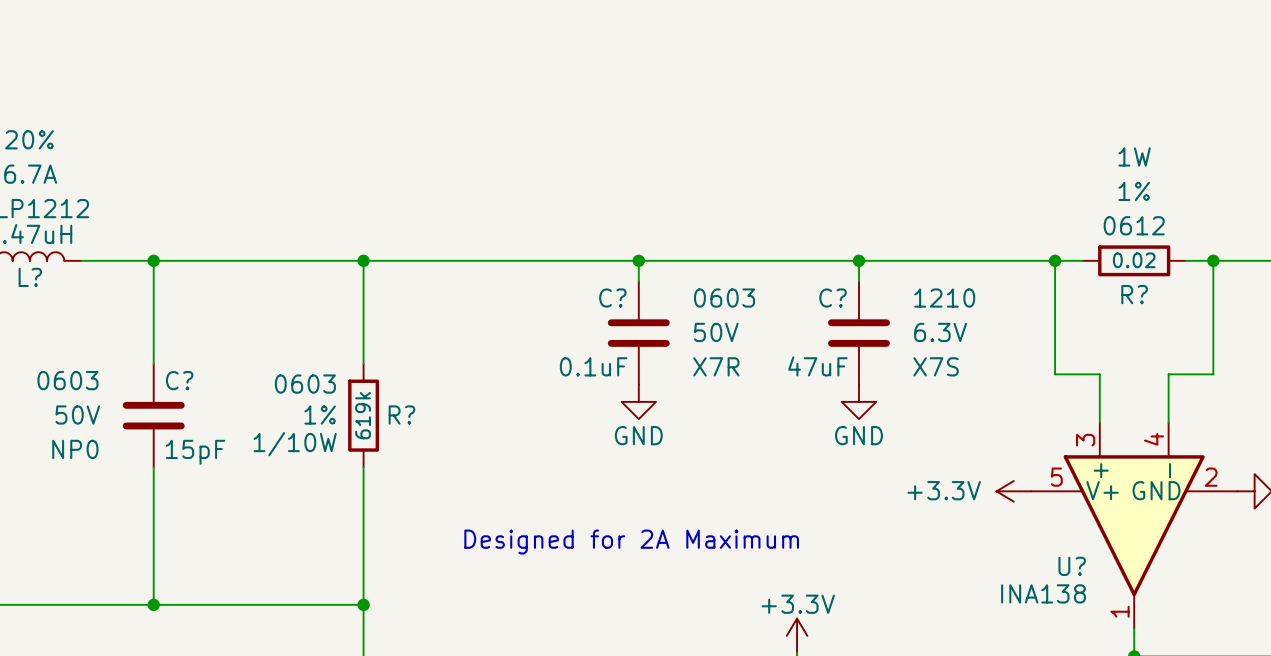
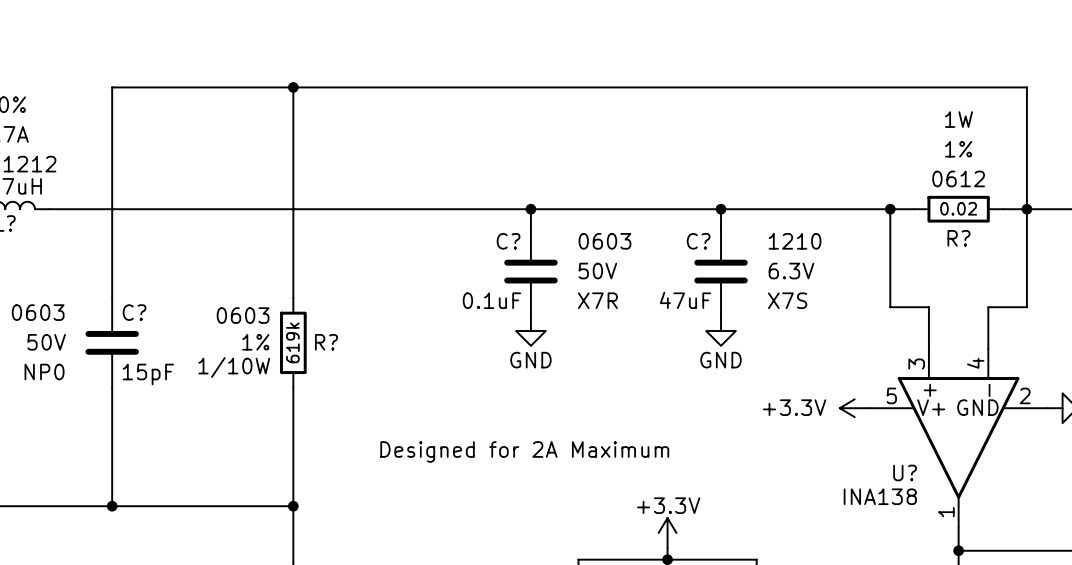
wire: none -> (293, 87) (293, 209)
junction: none -> (293, 87)
wire: none -> (112, 209) (112, 87) (1026, 87) (1026, 209)
junction: (153, 260) -> none
junction: (363, 260) -> none

